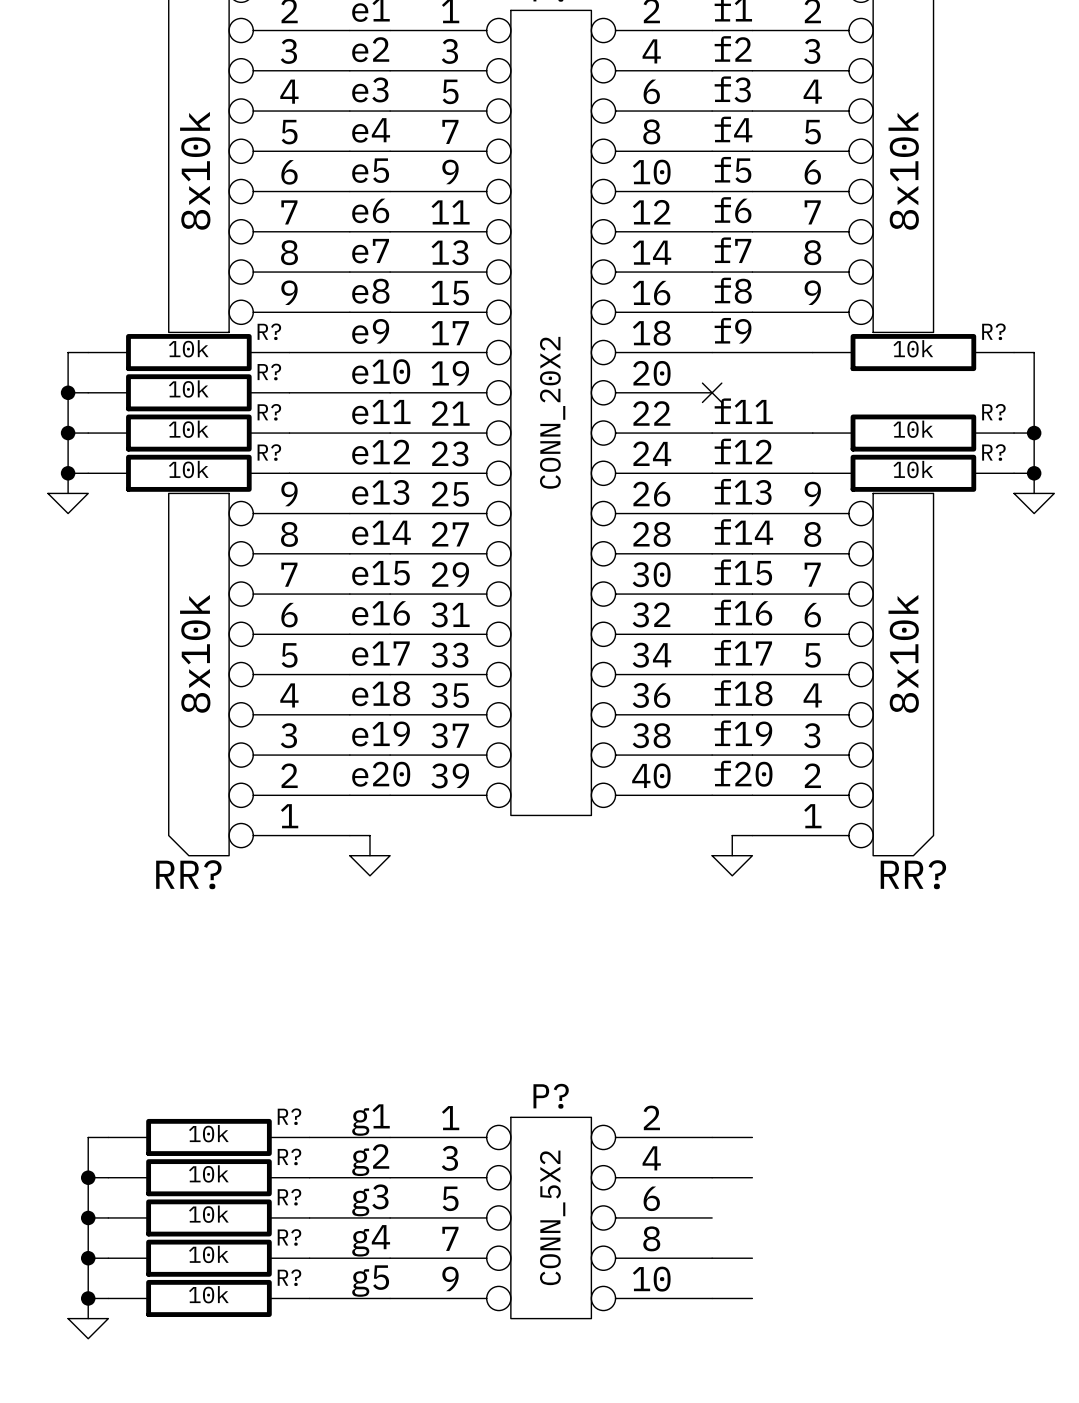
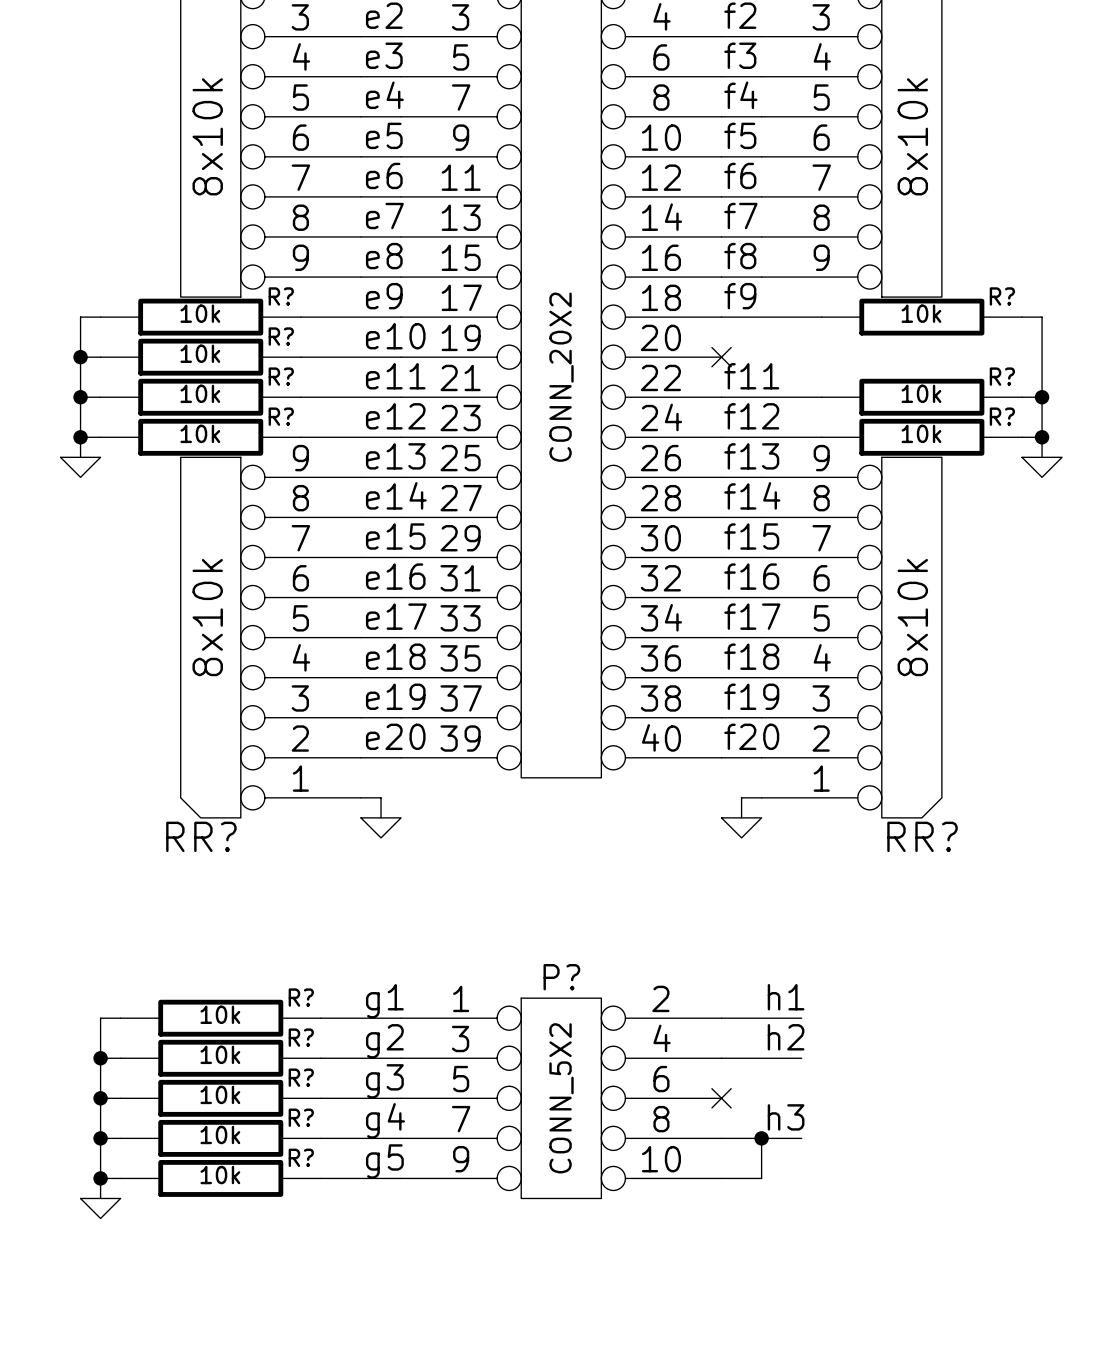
label: none -> h1 (786, 997)
label: none -> g1 (384, 1001)
wire: none -> (120, 1018) (100, 1018) (100, 1098)
R?: none -> 10k (220, 1018)
wire: none -> (721, 1018) (801, 1018)
label: none -> h2 (786, 1037)
label: none -> g2 (384, 1041)
junction: none -> (100, 1058)
R?: none -> 10k (220, 1058)
wire: none -> (721, 1058) (801, 1058)
label: g1 (370, 1120) -> g3 (384, 1081)
junction: none -> (100, 1098)
wire: (712, 1137) (752, 1137) -> none
no-connect mark: none -> (721, 1098)
label: none -> h3 (786, 1117)
label: g2 (370, 1160) -> g4 (385, 1120)
junction: none -> (761, 1138)
wire: none -> (801, 1138) (761, 1138) (761, 1178) (721, 1178)
label: g3 (370, 1200) -> g5 (384, 1161)
P? position: (551, 1217) -> (561, 1098)
wire: (88, 1238) (88, 1318) -> none
label: g4 (371, 1240) -> none
wire: (88, 1258) (108, 1258) -> none
junction: (88, 1258) -> none
R?: 10k (208, 1258) -> none
wire: (309, 1258) (390, 1258) -> (320, 1018) (401, 1018)
wire: (712, 1258) (752, 1258) -> none
label: g5 (370, 1281) -> none
wire: (88, 1298) (108, 1298) -> (100, 1058) (120, 1058)
junction: (88, 1298) -> none
R?: 10k (208, 1298) -> none
wire: (309, 1298) (390, 1298) -> (320, 1058) (401, 1058)
wire: (712, 1298) (752, 1298) -> none
power symbol position: (88, 1328) -> (100, 1208)

